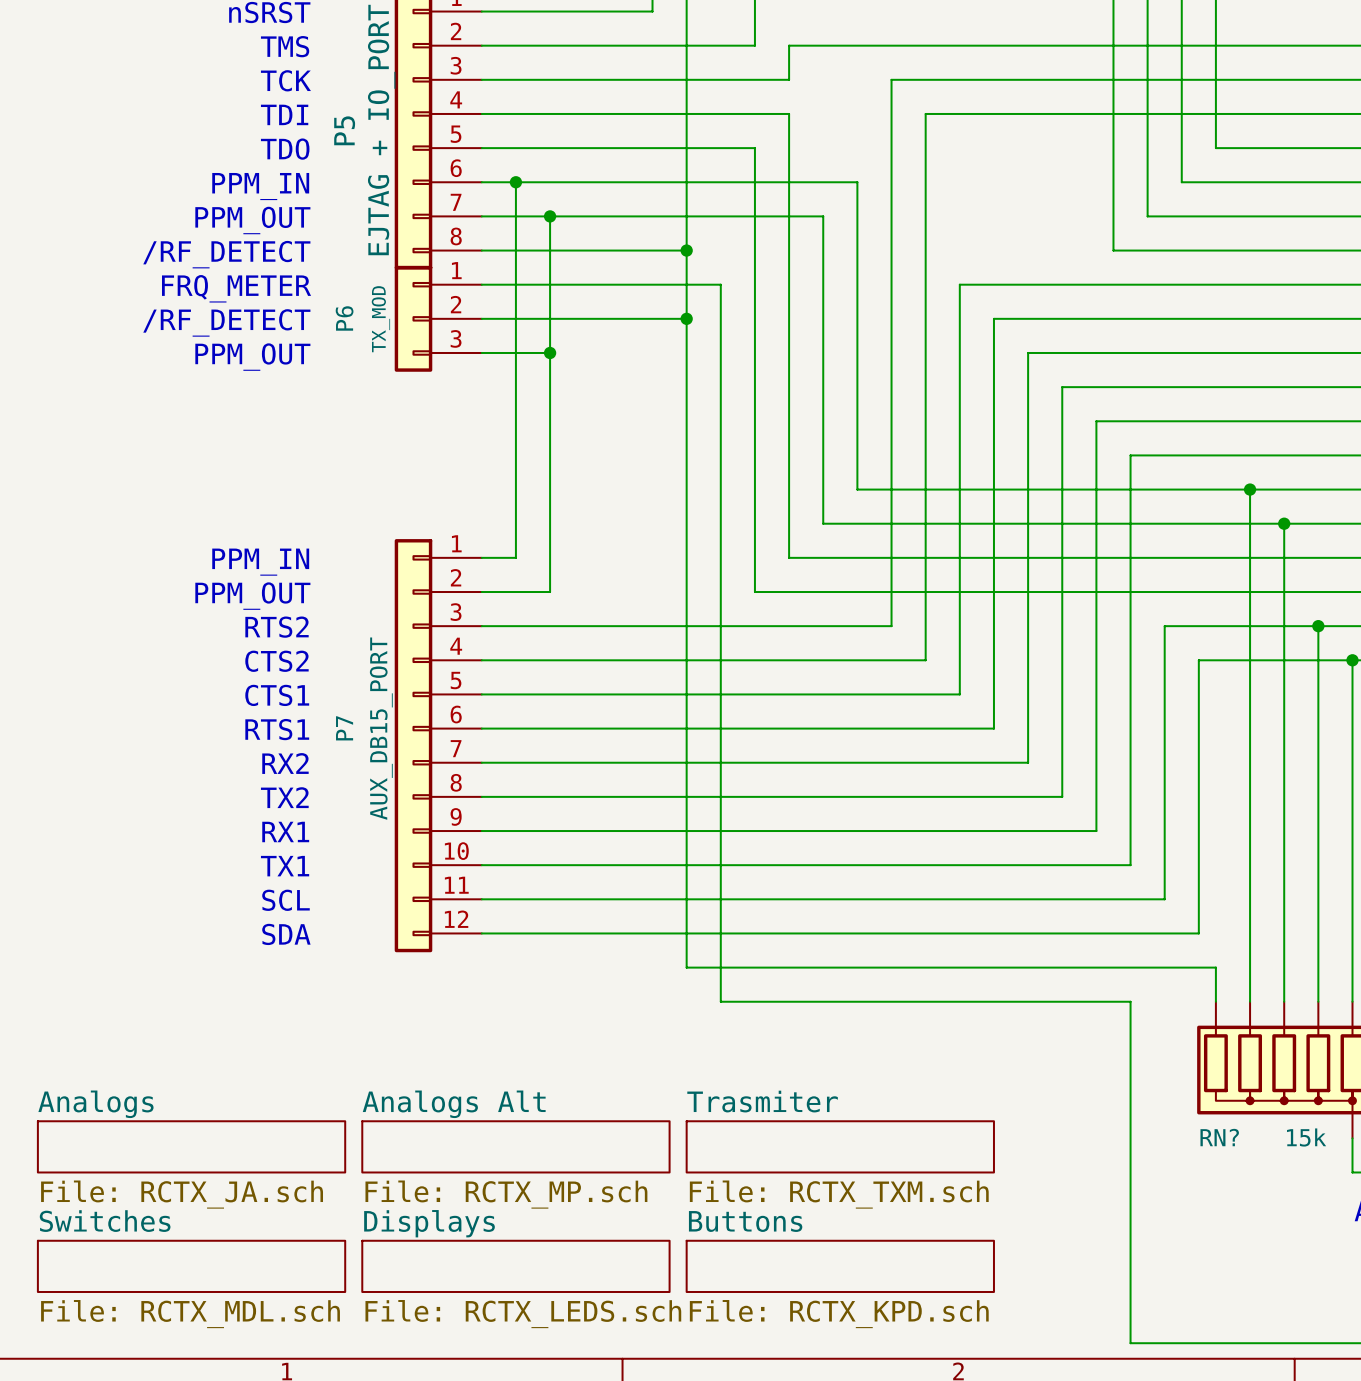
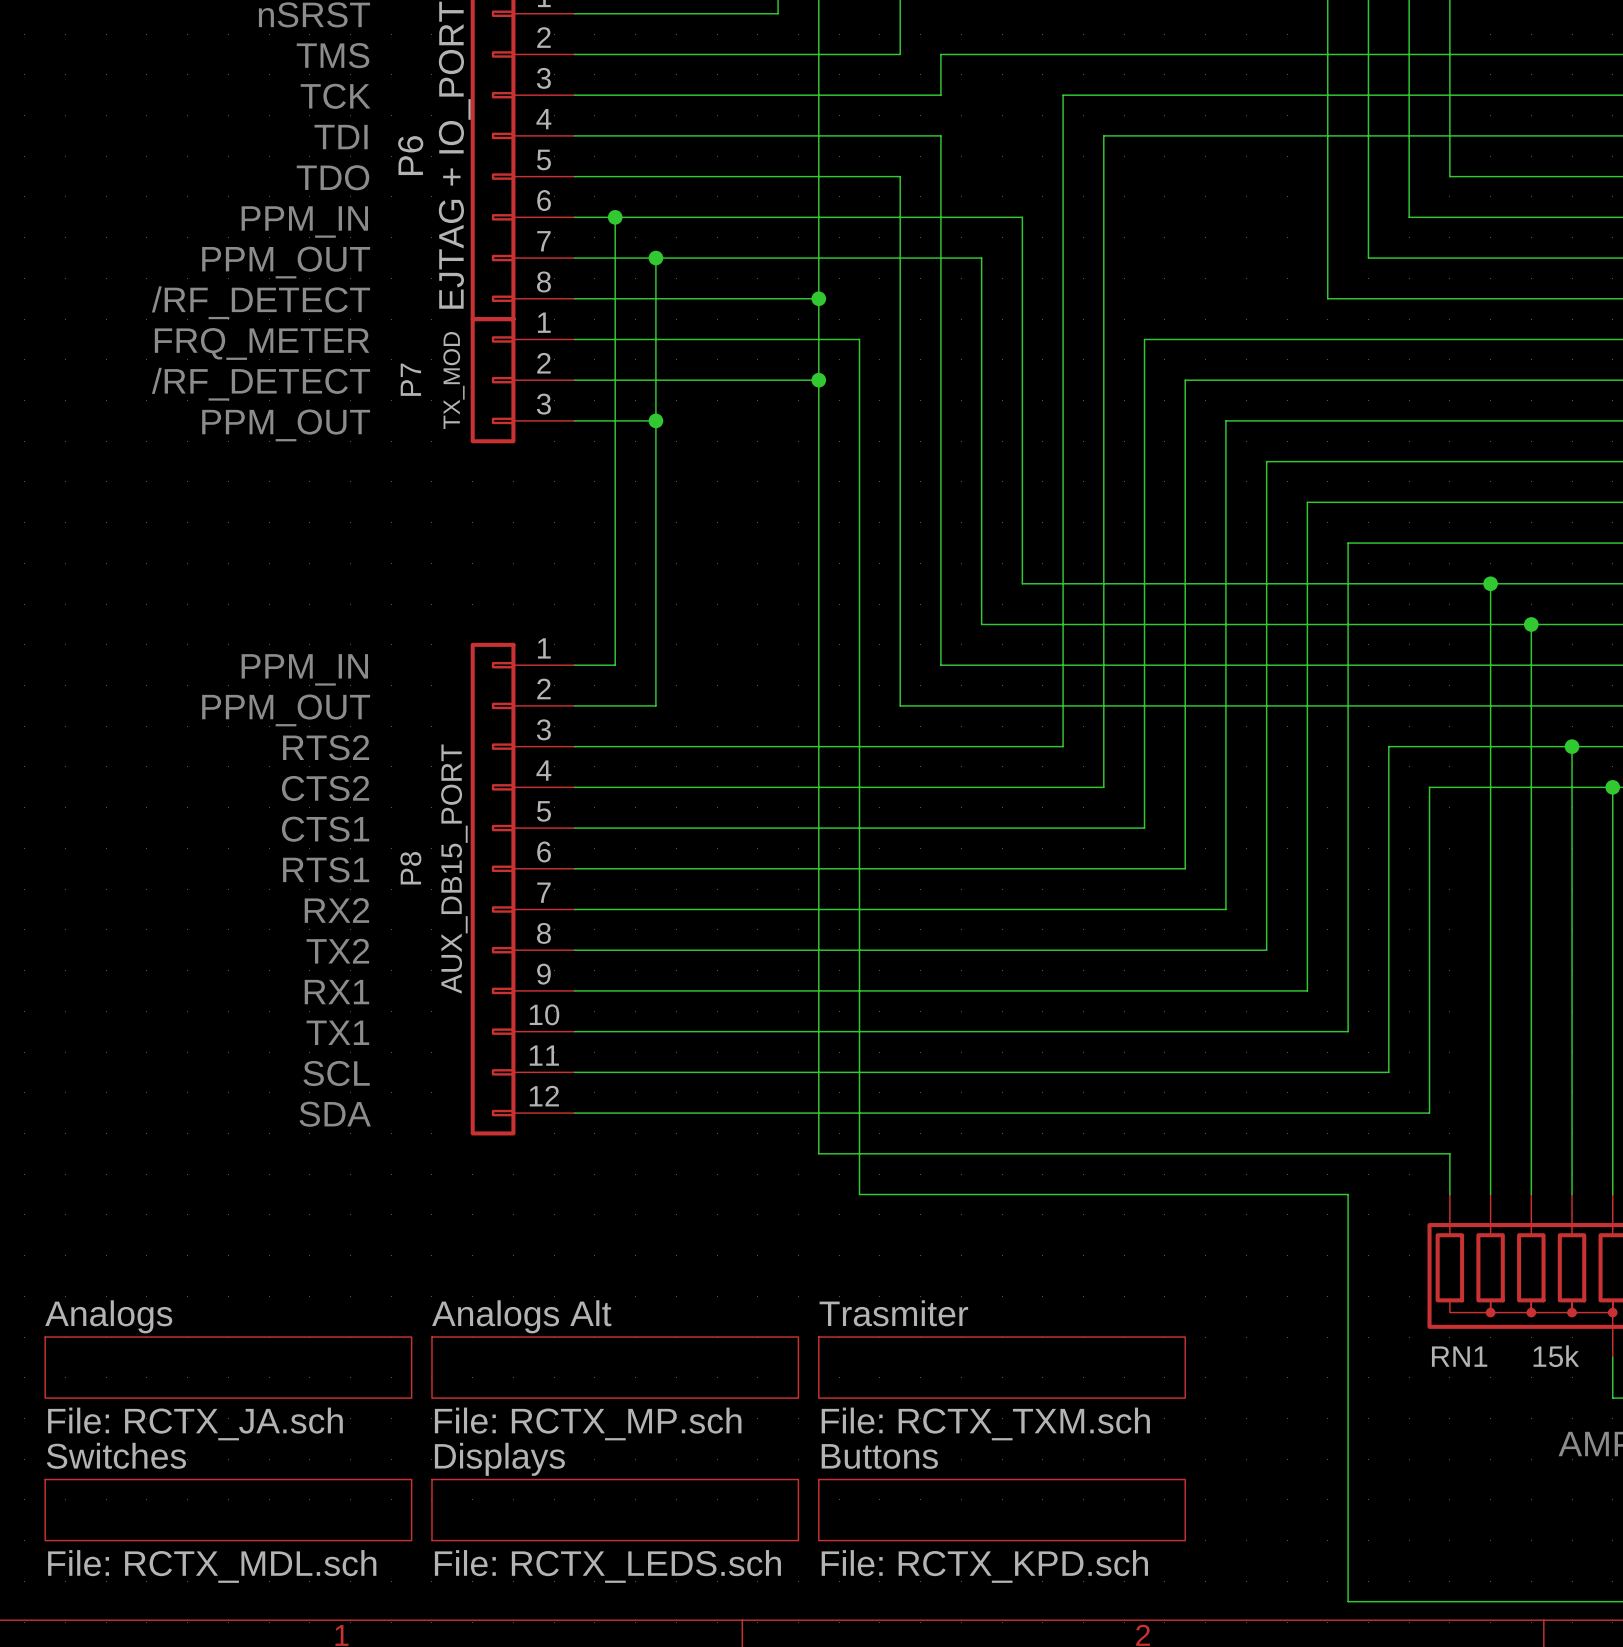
P5 name: P5 (344, 130) -> P6 (410, 155)
P6 name: P6 (344, 318) -> P7 (410, 379)
P7 name: P7 (344, 728) -> P8 (410, 868)
RN? name: RN? (1219, 1137) -> RN1 (1459, 1356)

